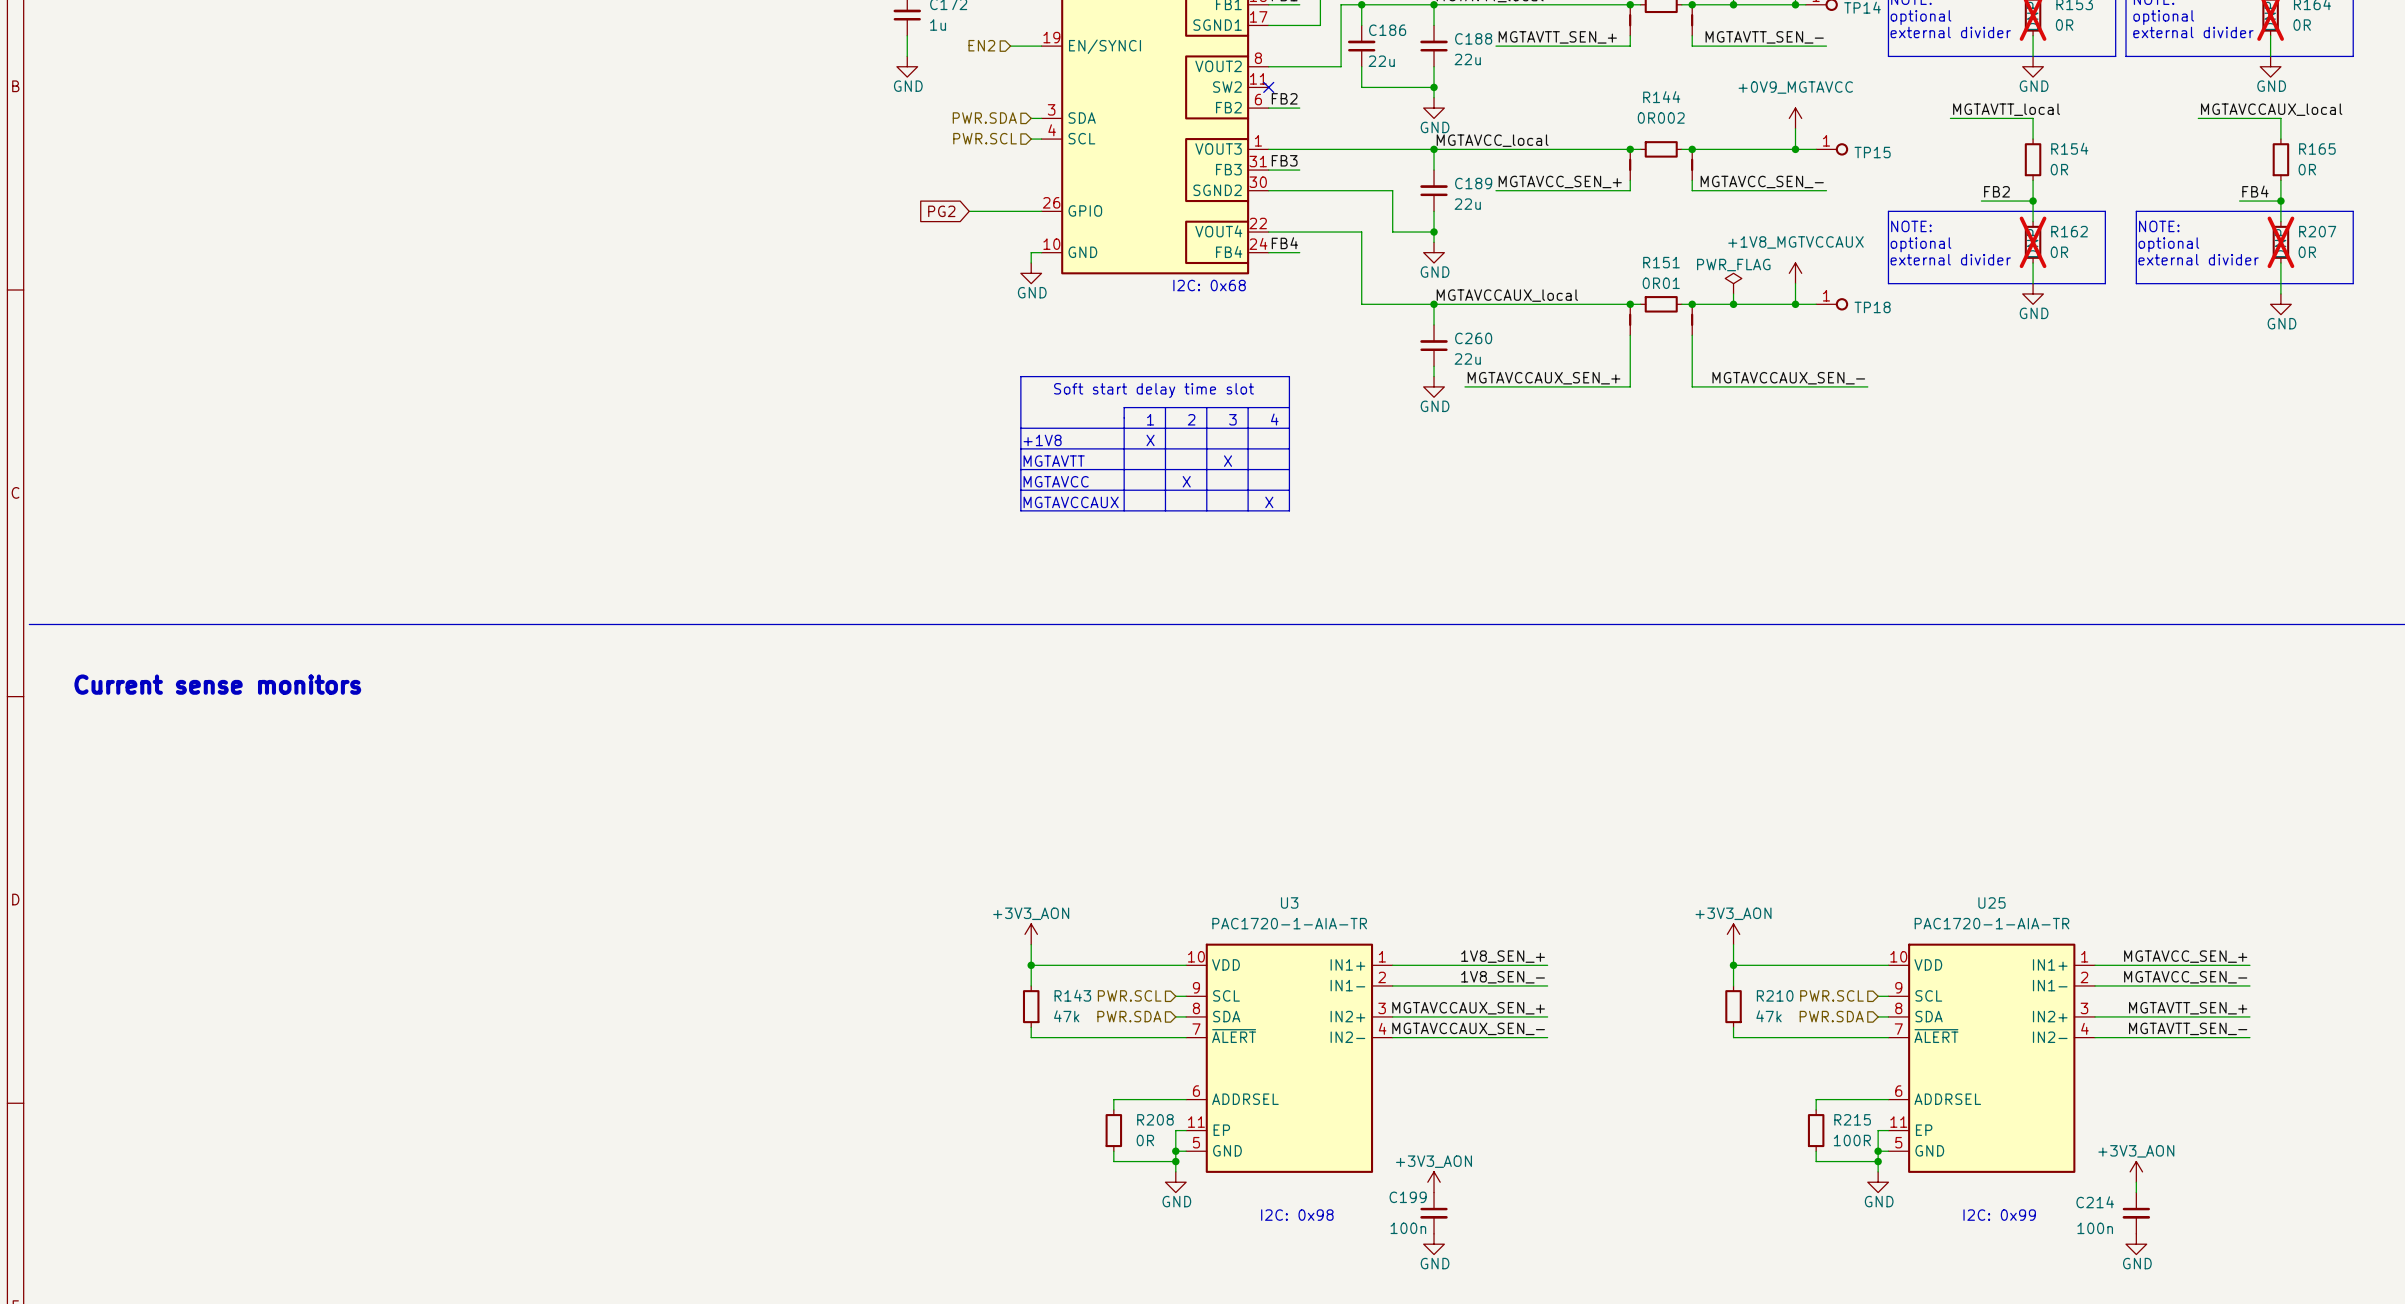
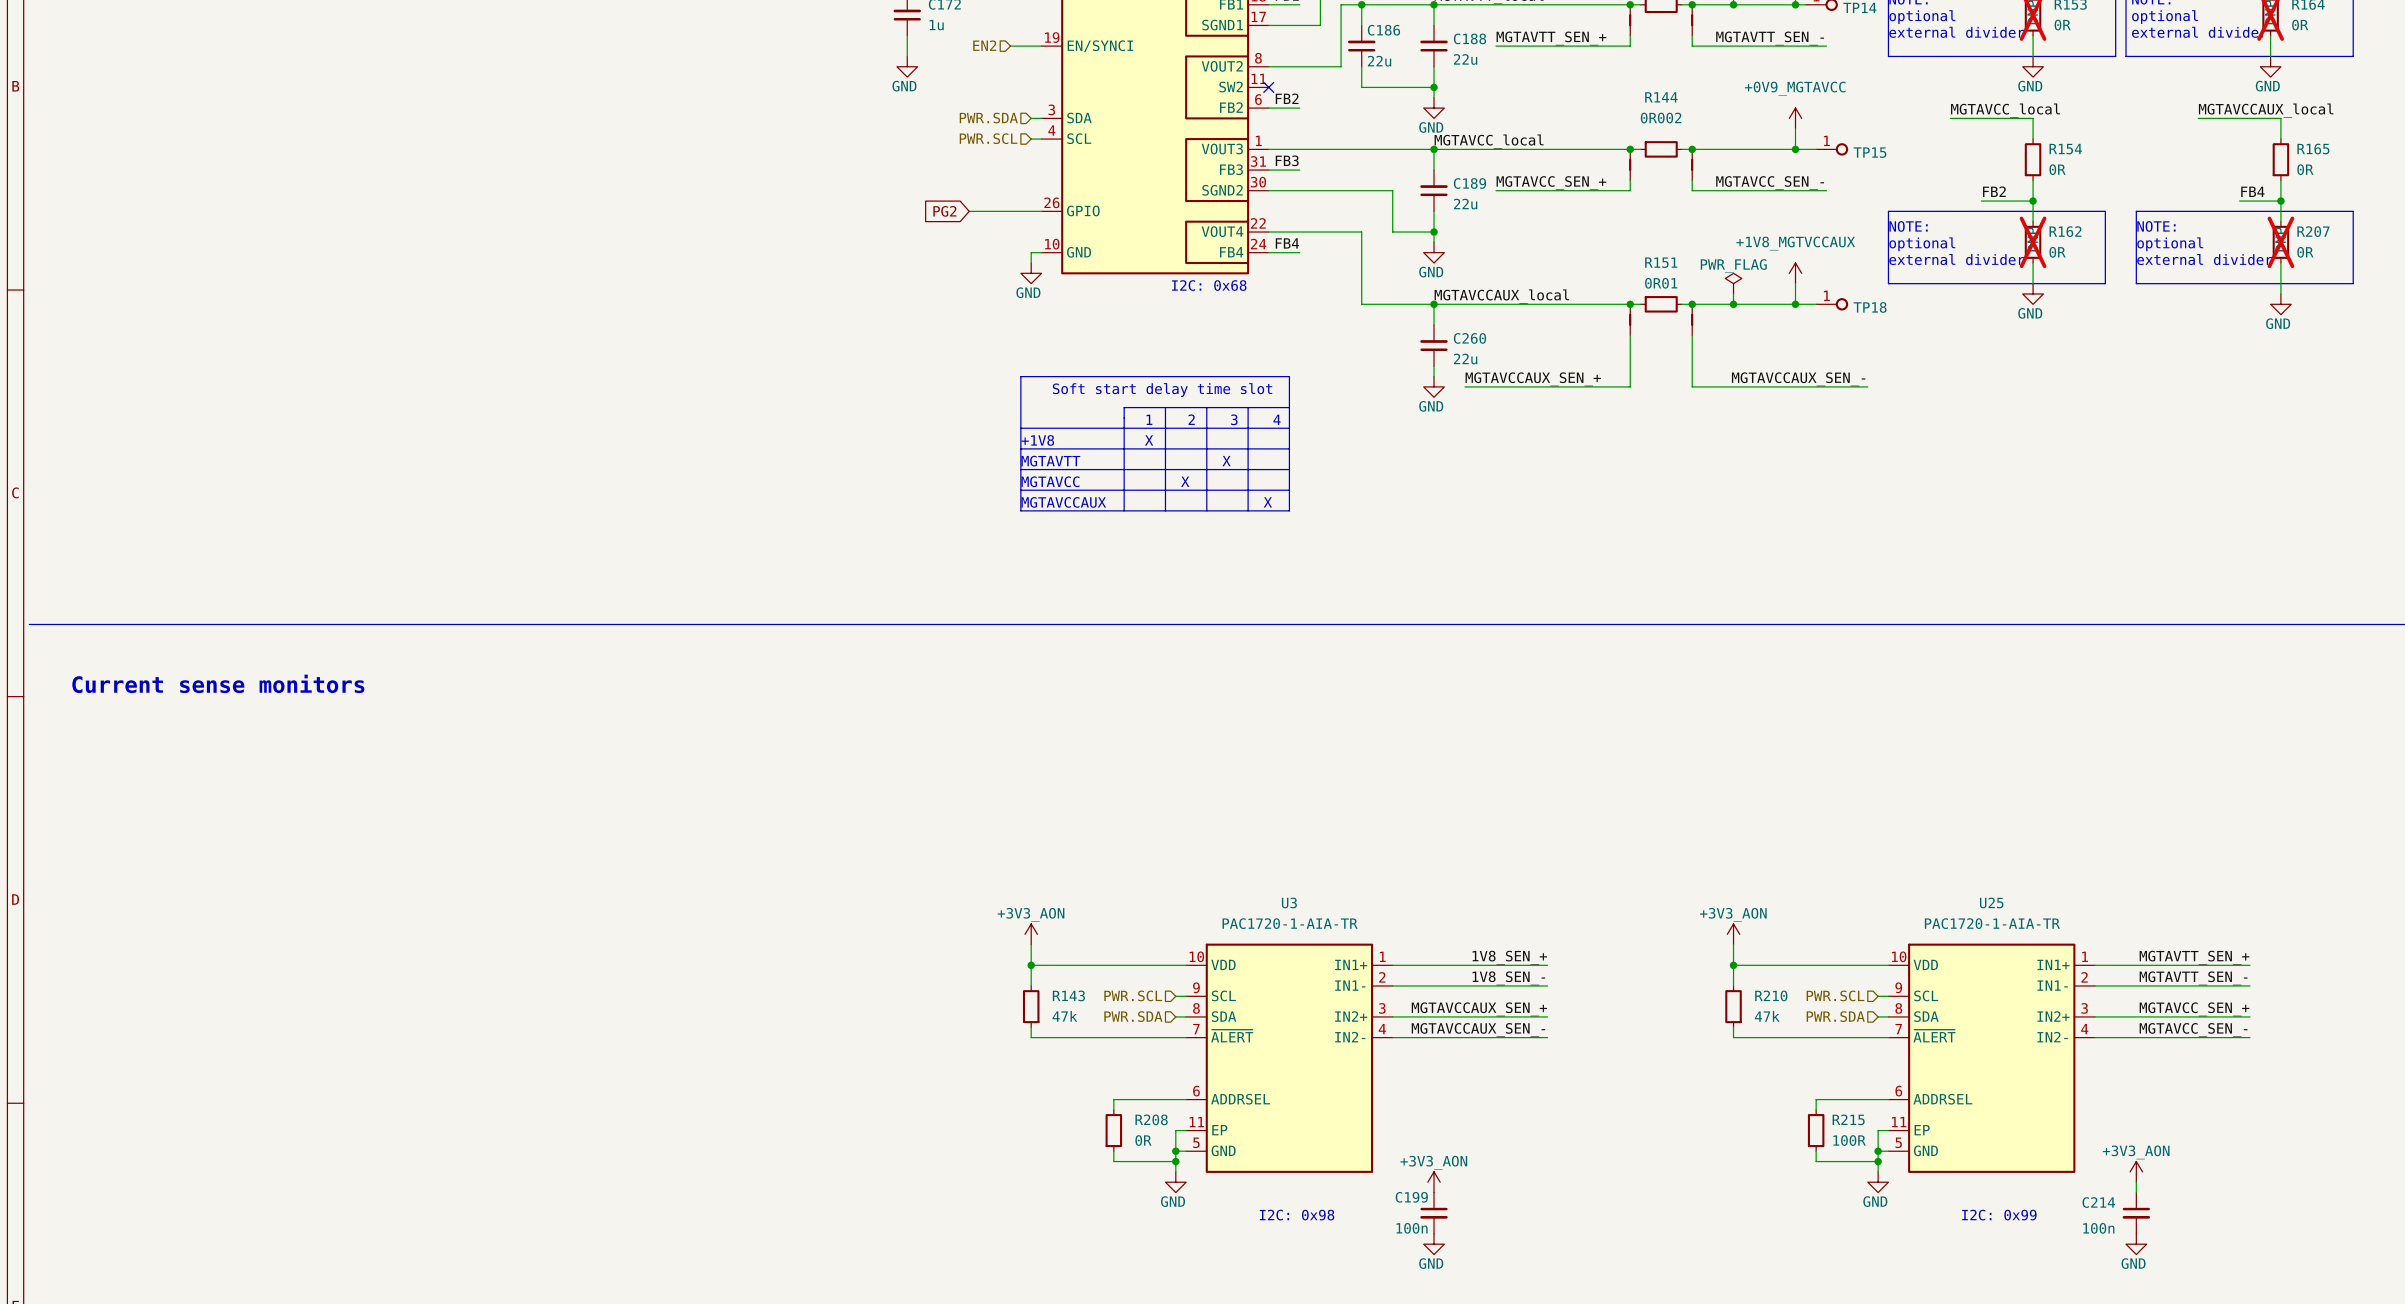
label: MGTAVTT_local (2006, 109) -> MGTAVCC_local (2005, 110)
label: MGTAVCC_SEN_+ (2185, 956) -> MGTAVTT_SEN_+ (2194, 957)
label: MGTAVCC_SEN_- (2185, 977) -> MGTAVTT_SEN_- (2193, 978)
label: MGTAVTT_SEN_+ (2188, 1008) -> MGTAVCC_SEN_+ (2194, 1009)
label: MGTAVTT_SEN_- (2188, 1028) -> MGTAVCC_SEN_- (2193, 1029)

